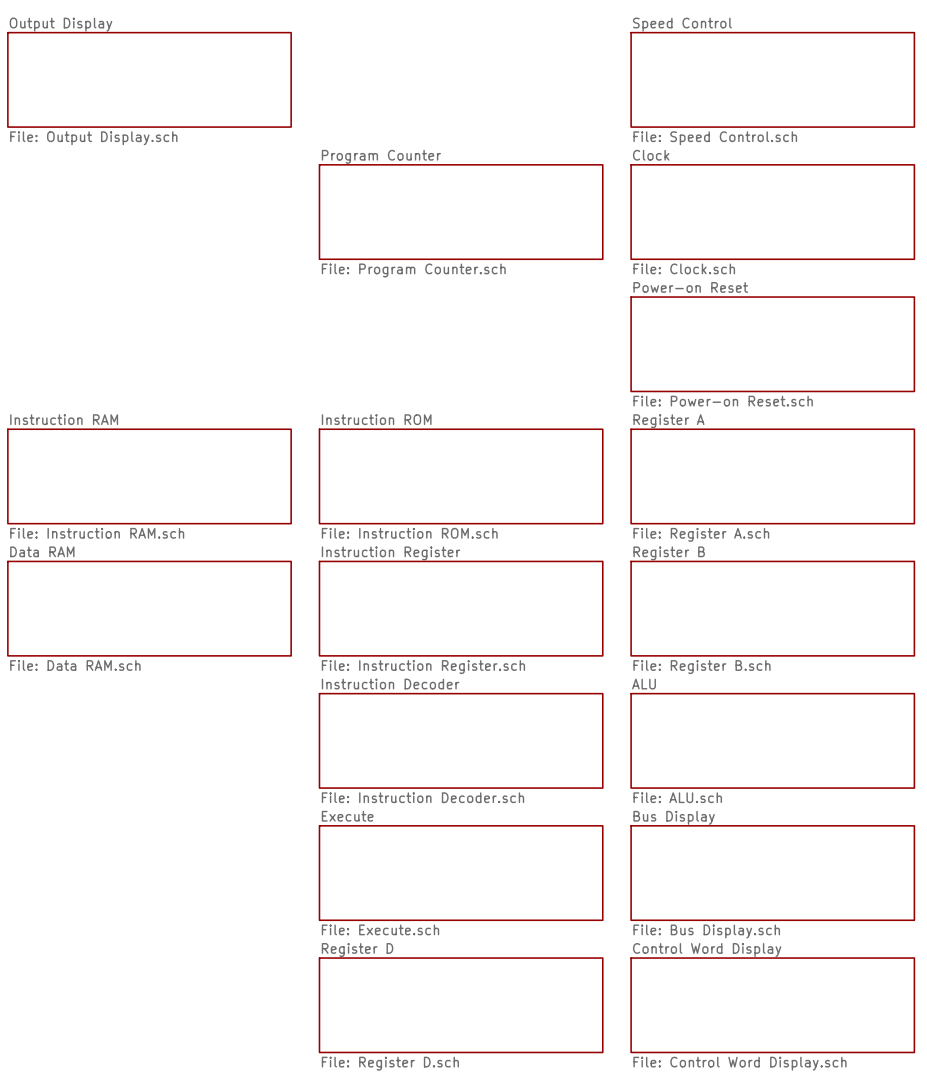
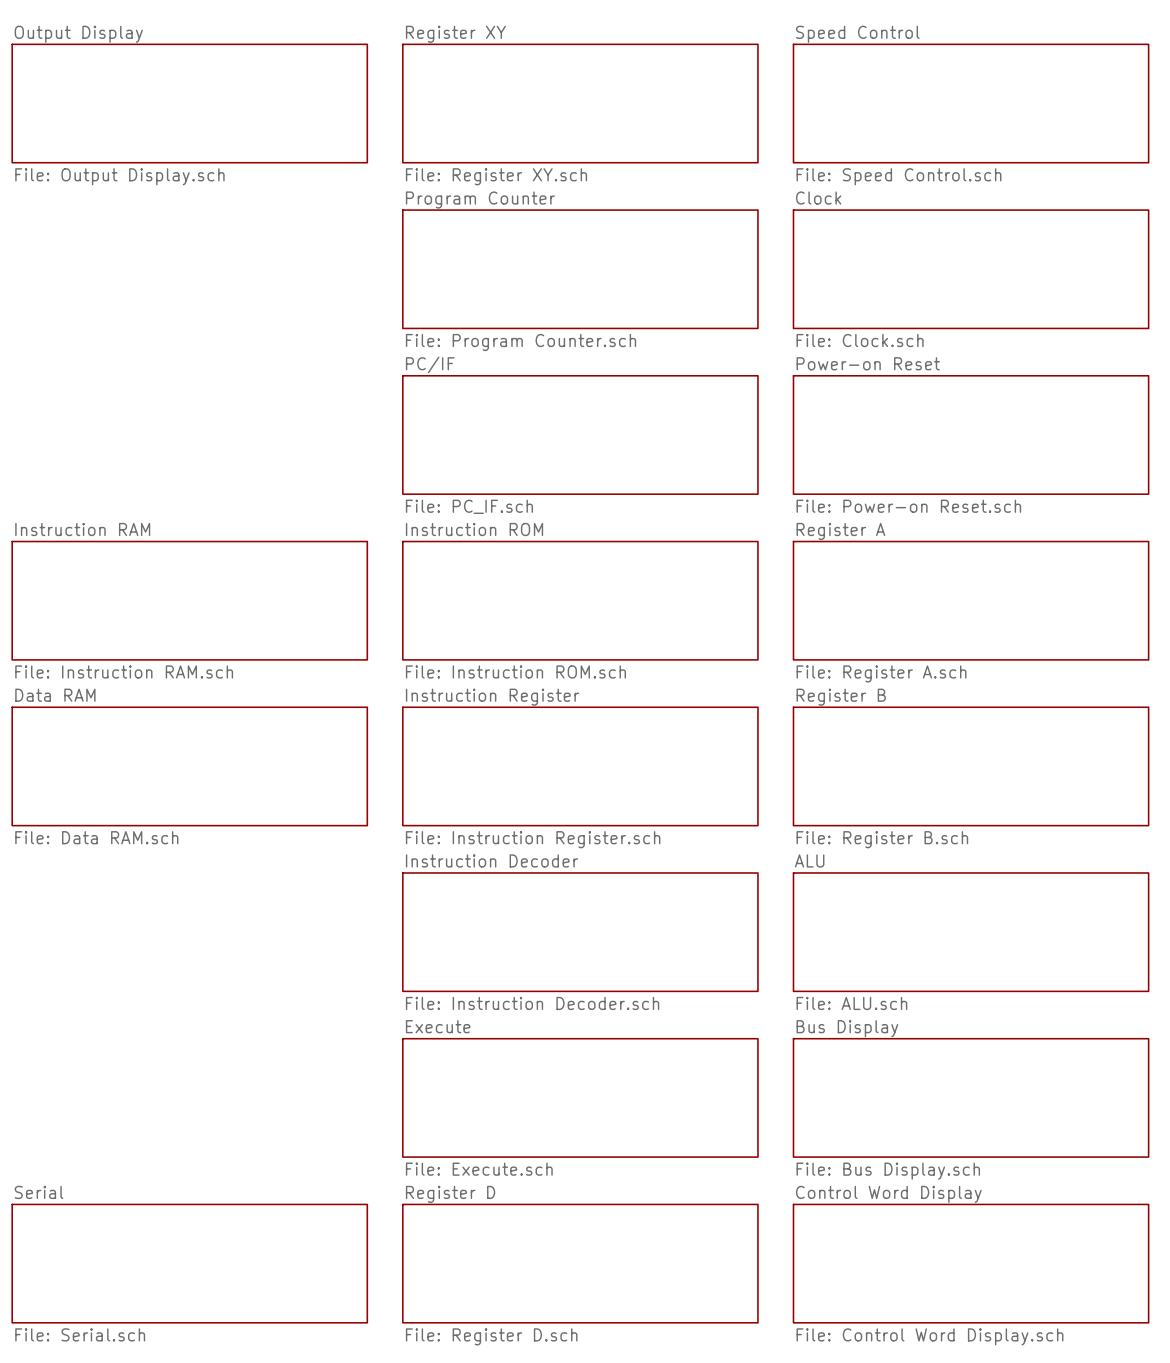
sheet Register XY: none -> File: Register XY.sch (580, 103)
sheet PC/IF: none -> File: PC_IF.sch (580, 434)
sheet Serial: none -> File: Serial.sch (189, 1263)

